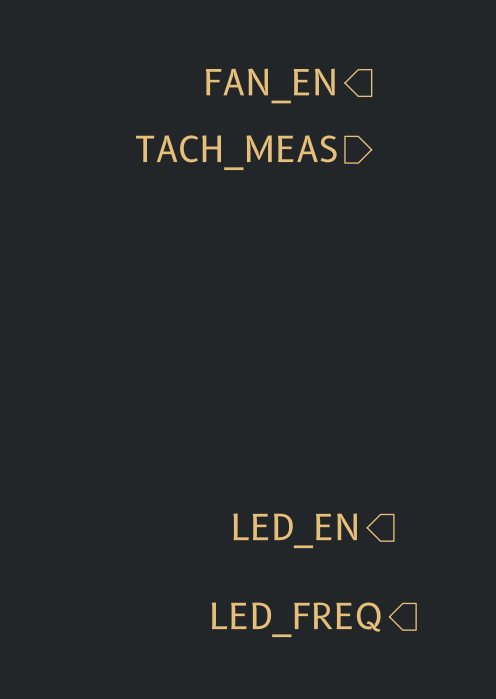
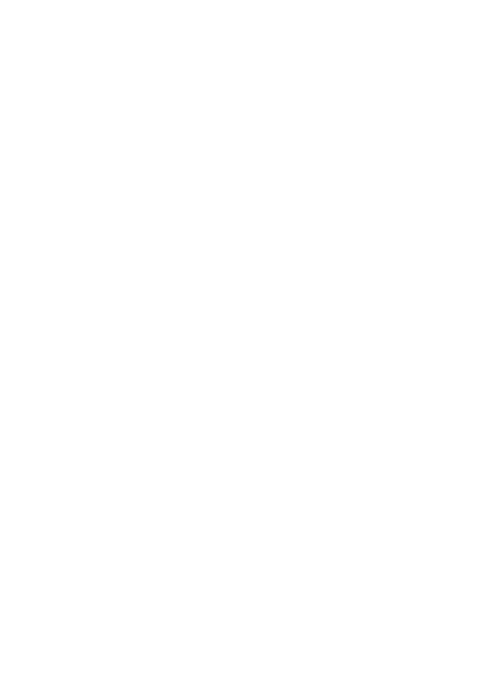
hierarchical label: FAN_EN (270, 86) -> none
hierarchical label: TACH_MEAS (236, 152) -> none
hierarchical label: LED_EN (295, 530) -> none
hierarchical label: LED_FREQ (296, 619) -> none

